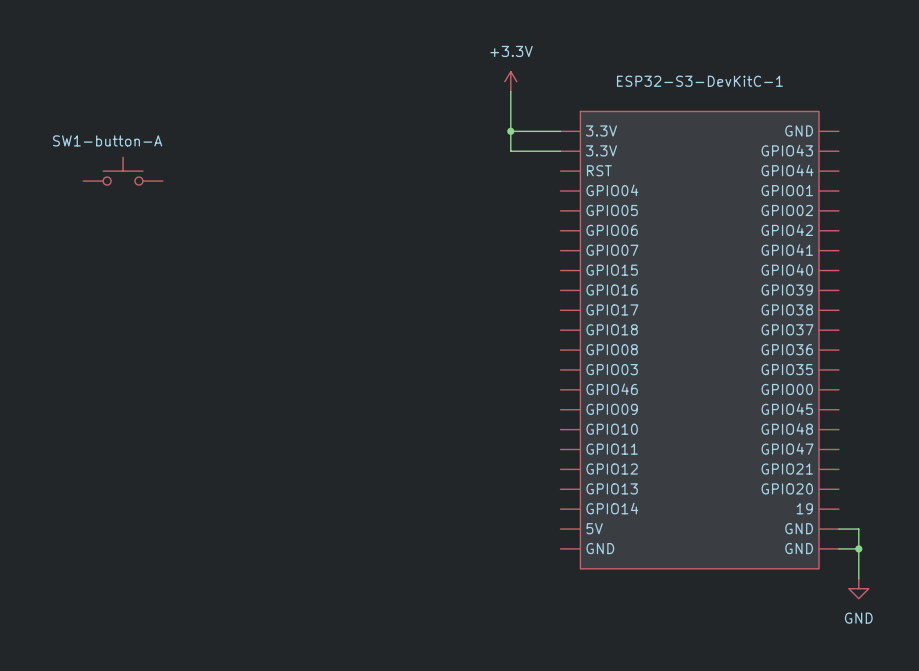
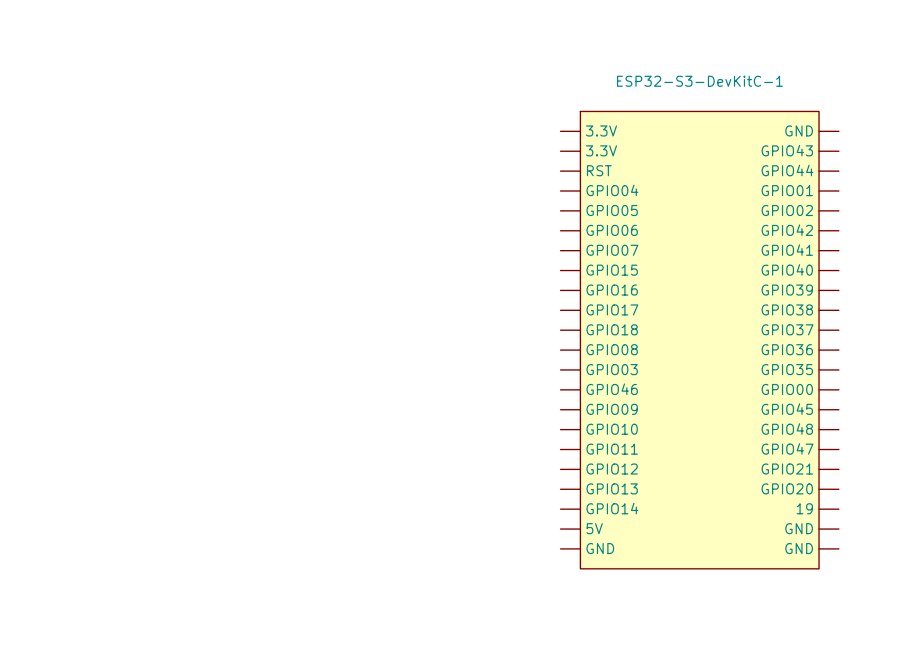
power symbol: +3.3V (510, 81) -> none
wire: (510, 91) (510, 151) (560, 151) -> none
wire: (510, 131) (560, 131) -> none
junction: (510, 131) -> none
SW1-button-A: (123, 171) -> none
wire: (838, 529) (858, 529) (858, 578) -> none
wire: (838, 548) (858, 548) -> none
junction: (858, 548) -> none
power symbol: GND (858, 588) -> none

